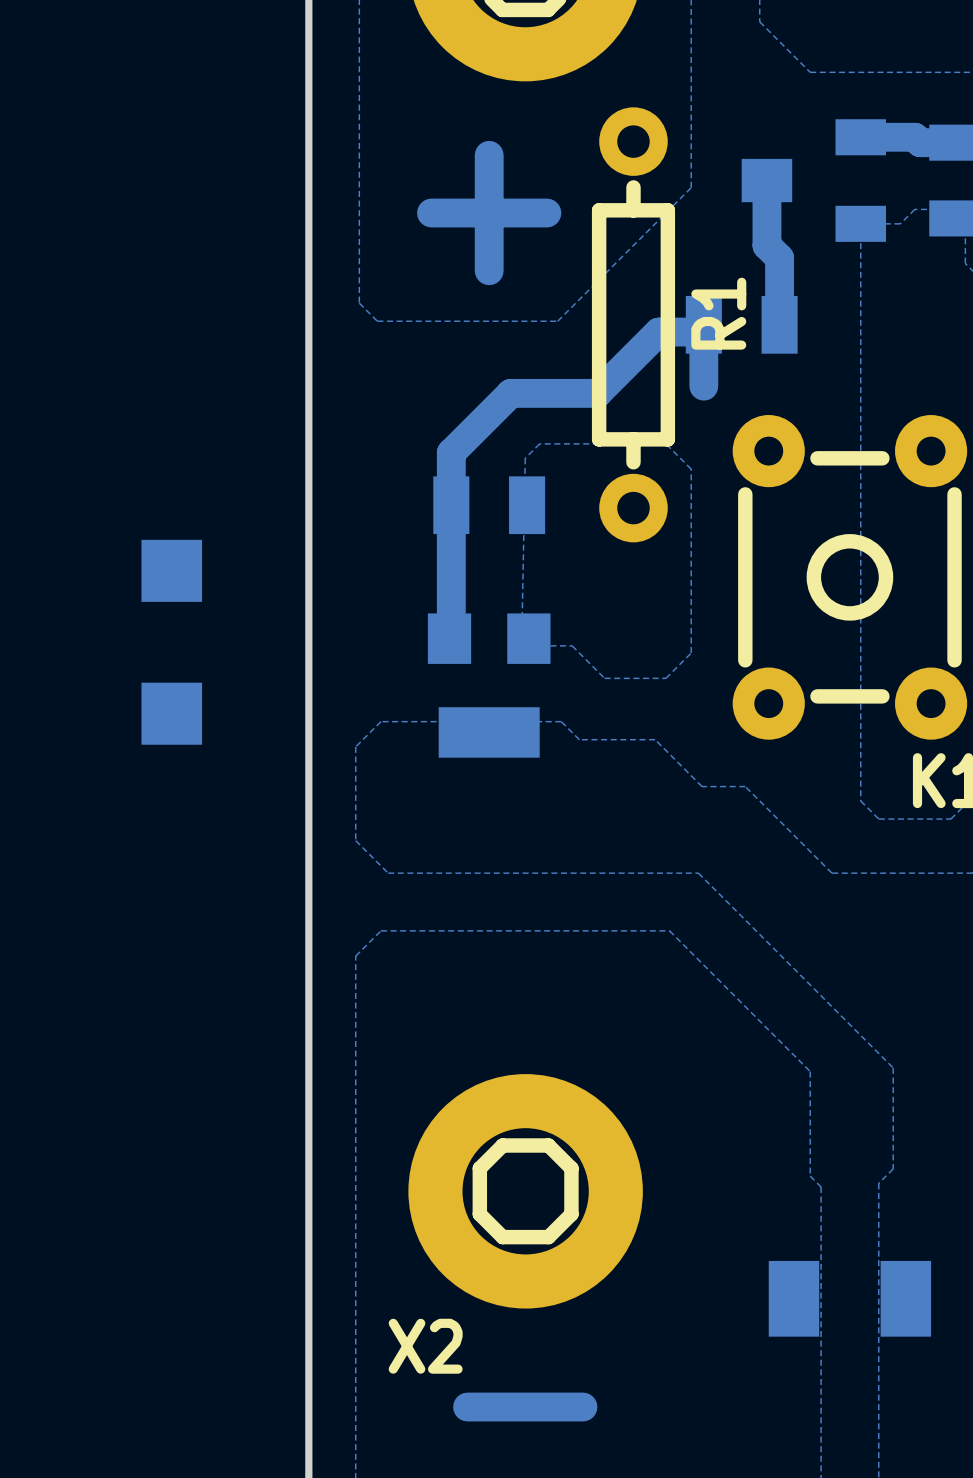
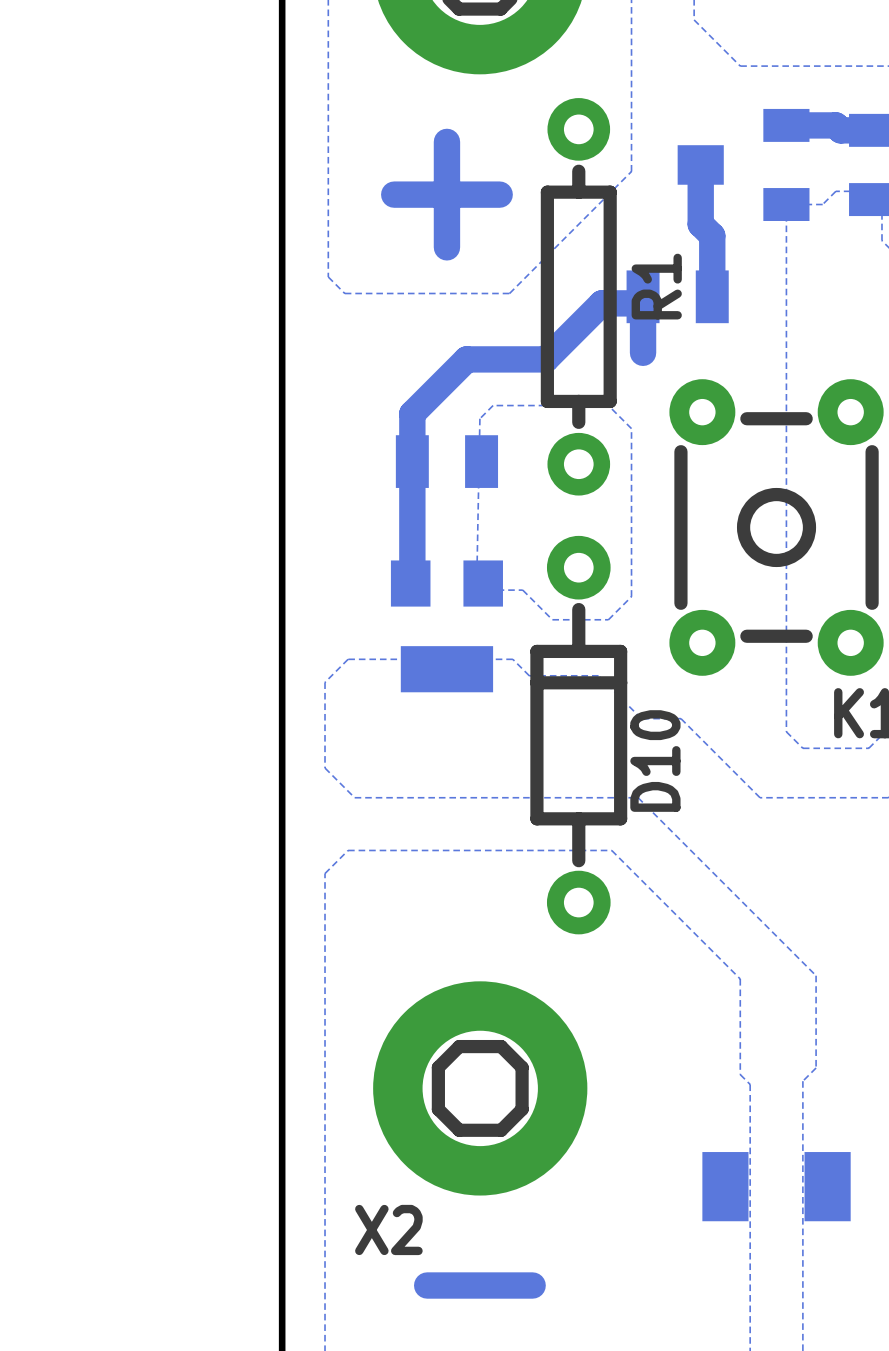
part: (171, 642) -> none
D10: none -> (578, 735)

